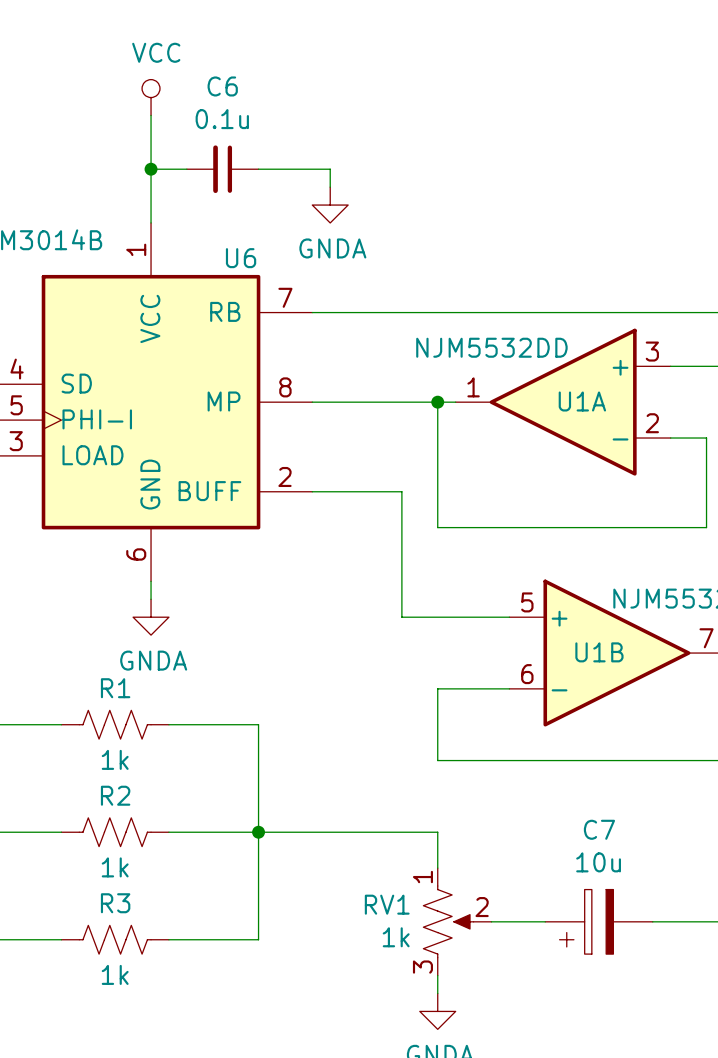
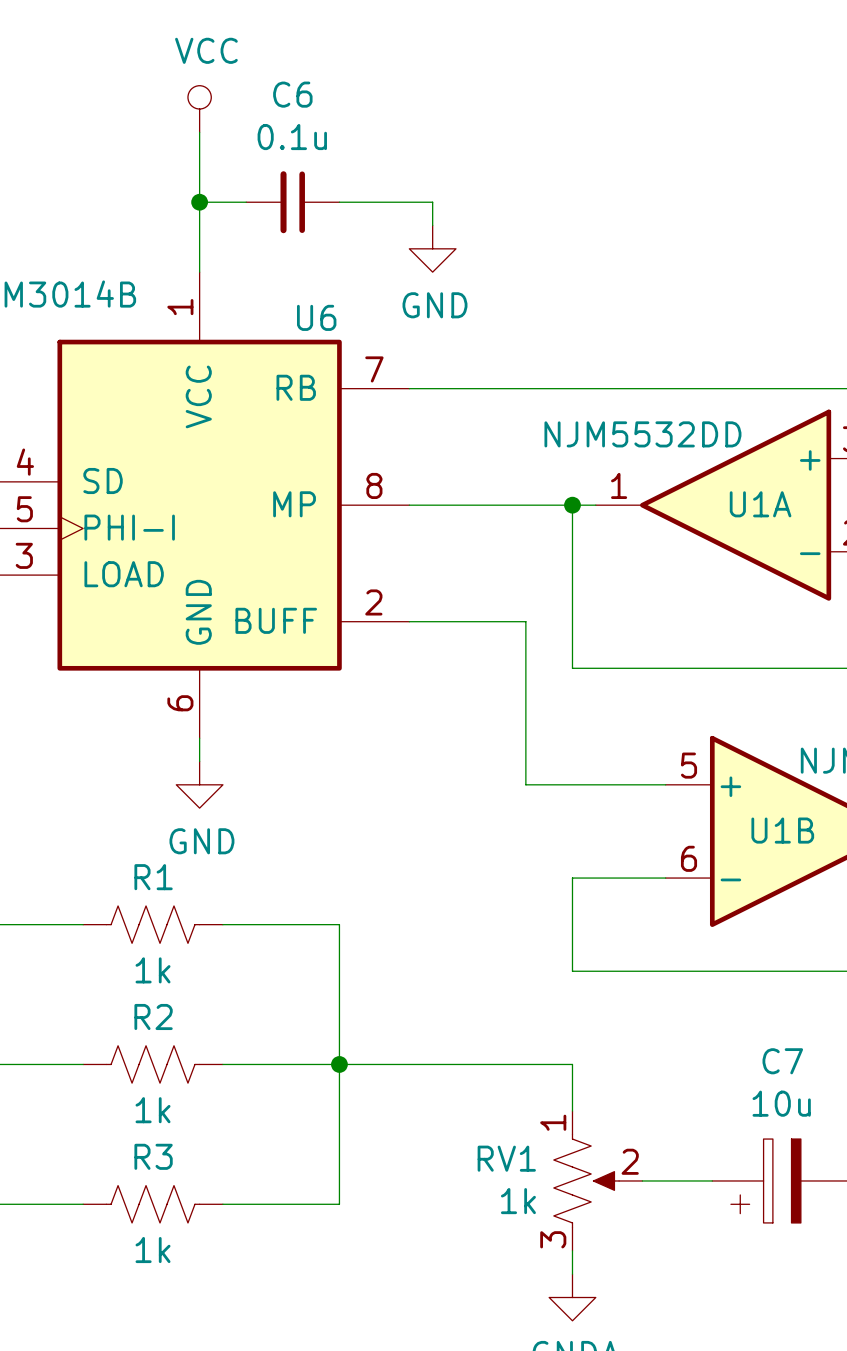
power symbol: GNDA (330, 205) -> GND (432, 248)
power symbol: GNDA (151, 617) -> GND (199, 784)

